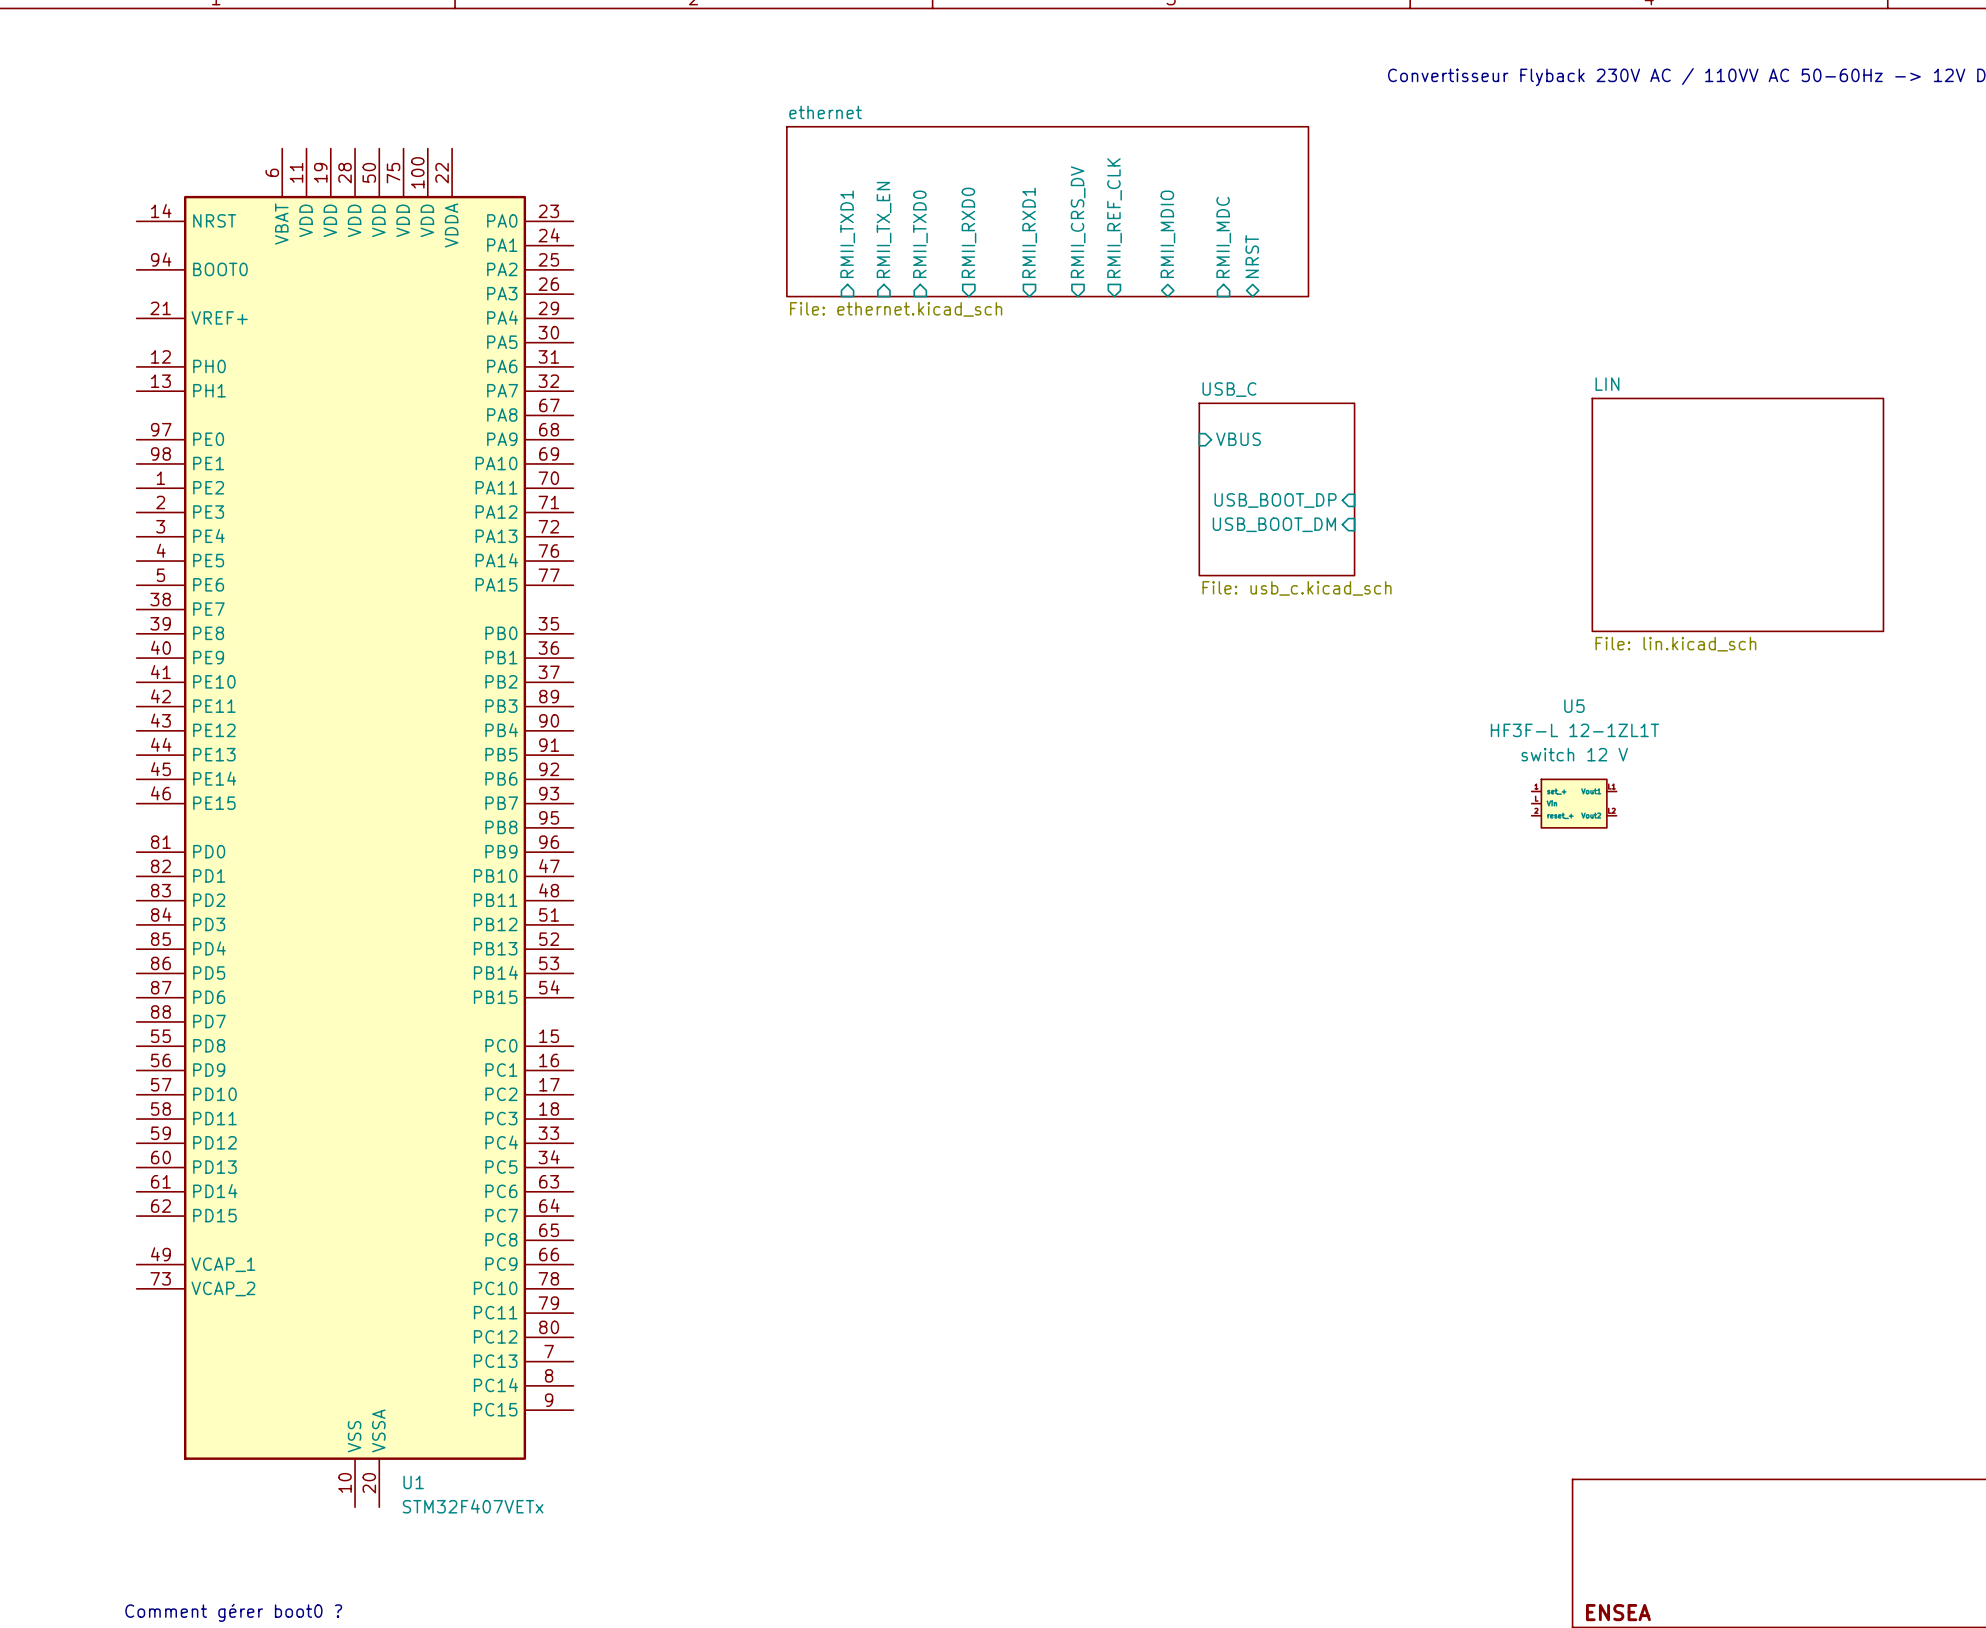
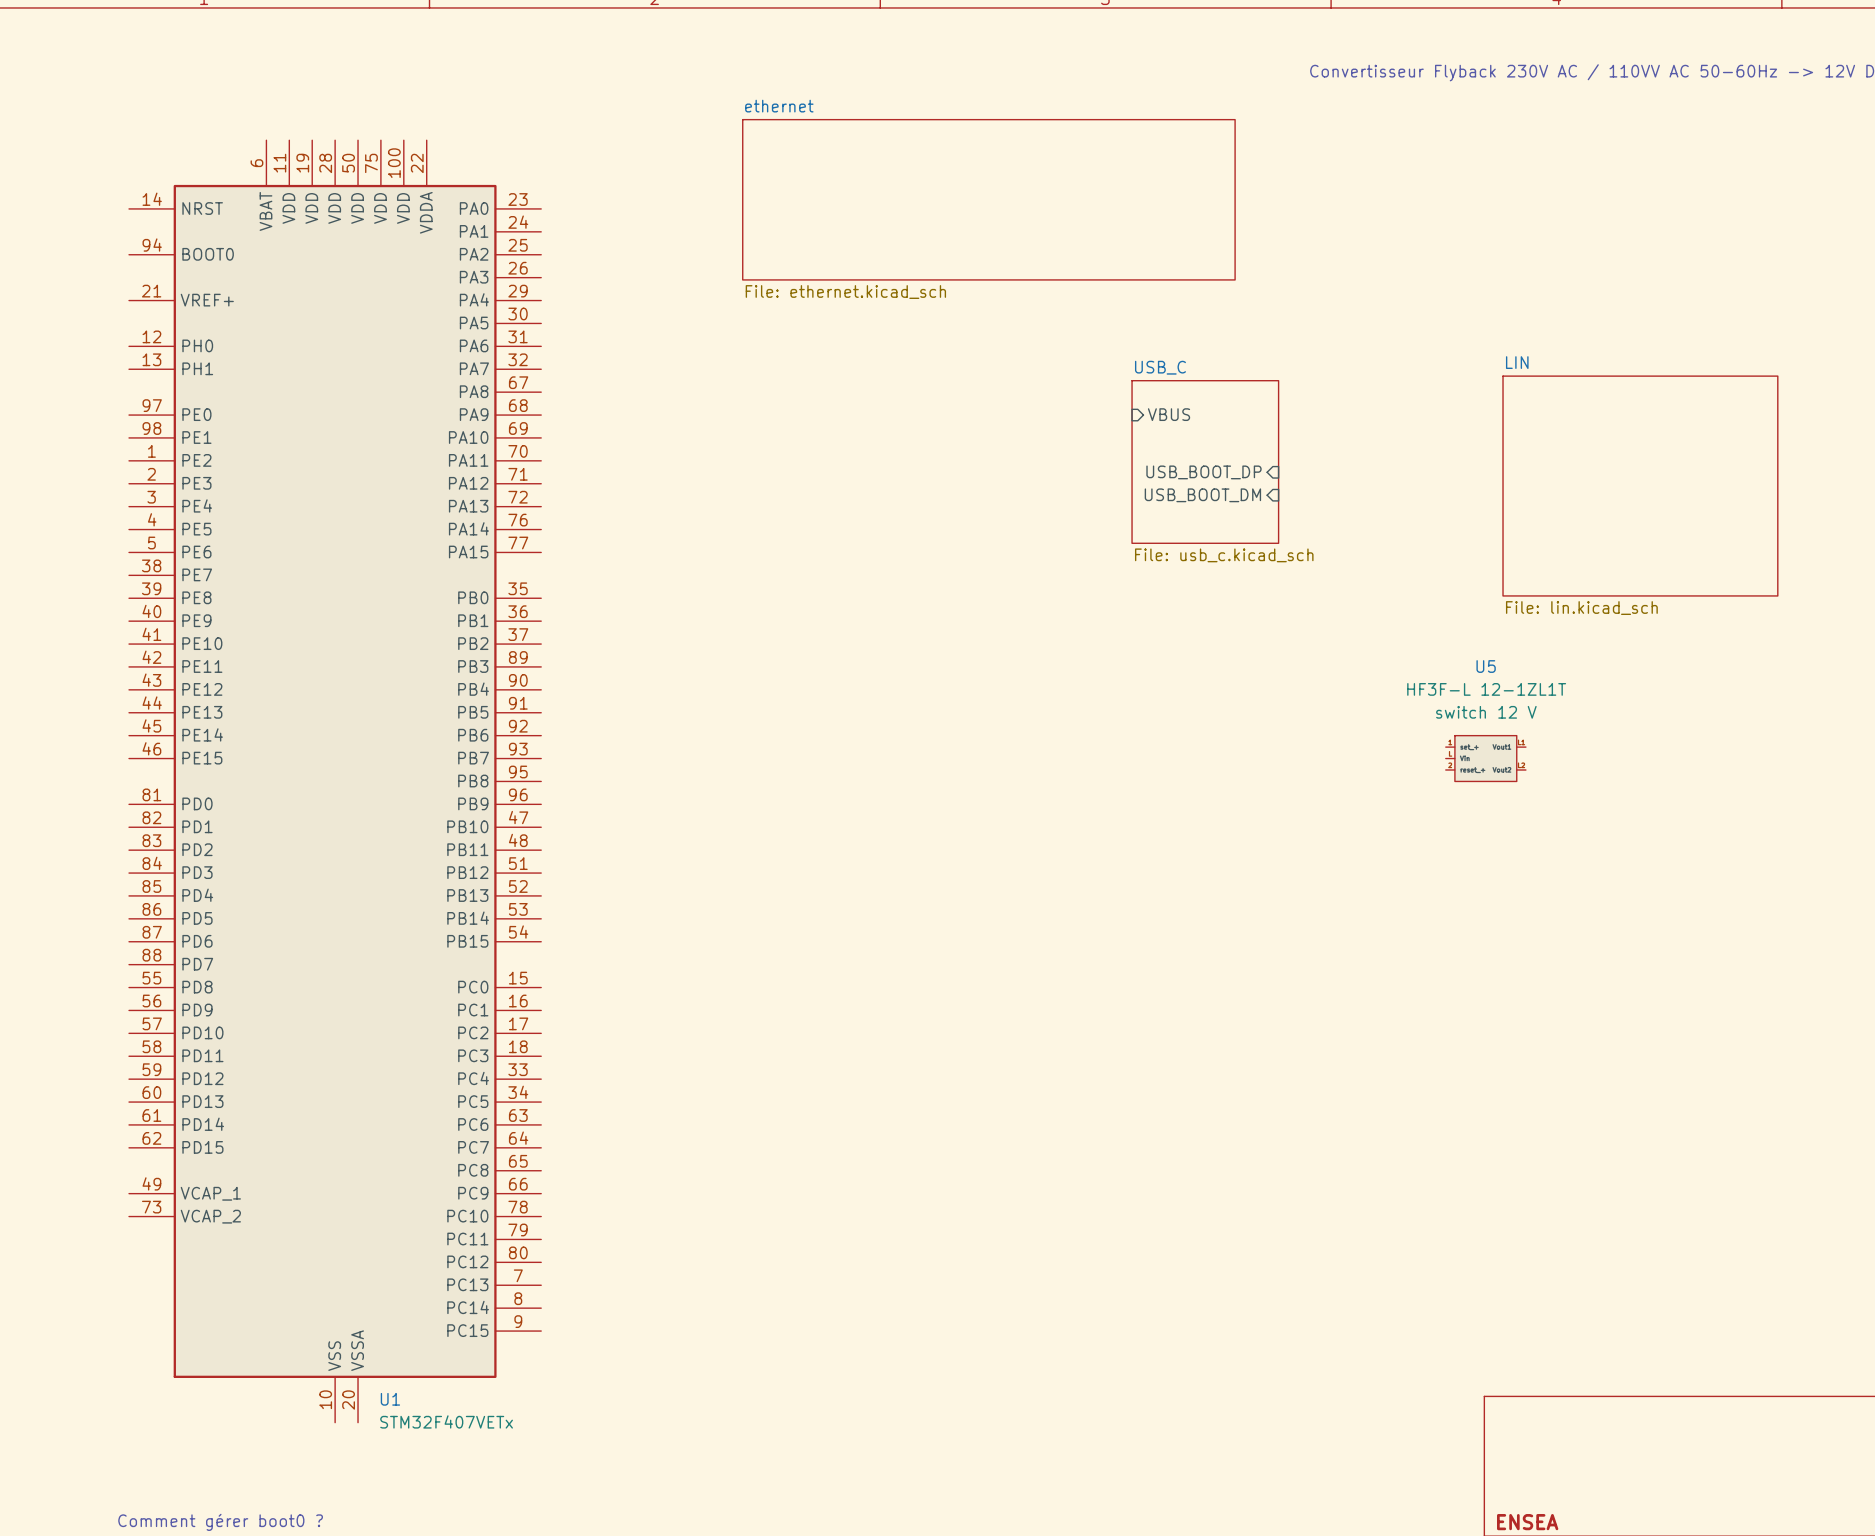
sheet pin: RMII_REF_CLK (1114, 218) -> none
sheet pin: RMII_CRS_DV (1078, 222) -> none
sheet pin: RMII_TX_EN (884, 229) -> none
sheet pin: RMII_RXD0 (968, 232) -> none
sheet pin: RMII_RXD1 (1029, 232) -> none
sheet pin: RMII_TXD1 (847, 234) -> none
sheet pin: RMII_TXD0 (920, 234) -> none
sheet pin: RMII_MDIO (1167, 234) -> none
sheet pin: RMII_MDC (1223, 237) -> none
sheet pin: NRST (1252, 256) -> none

